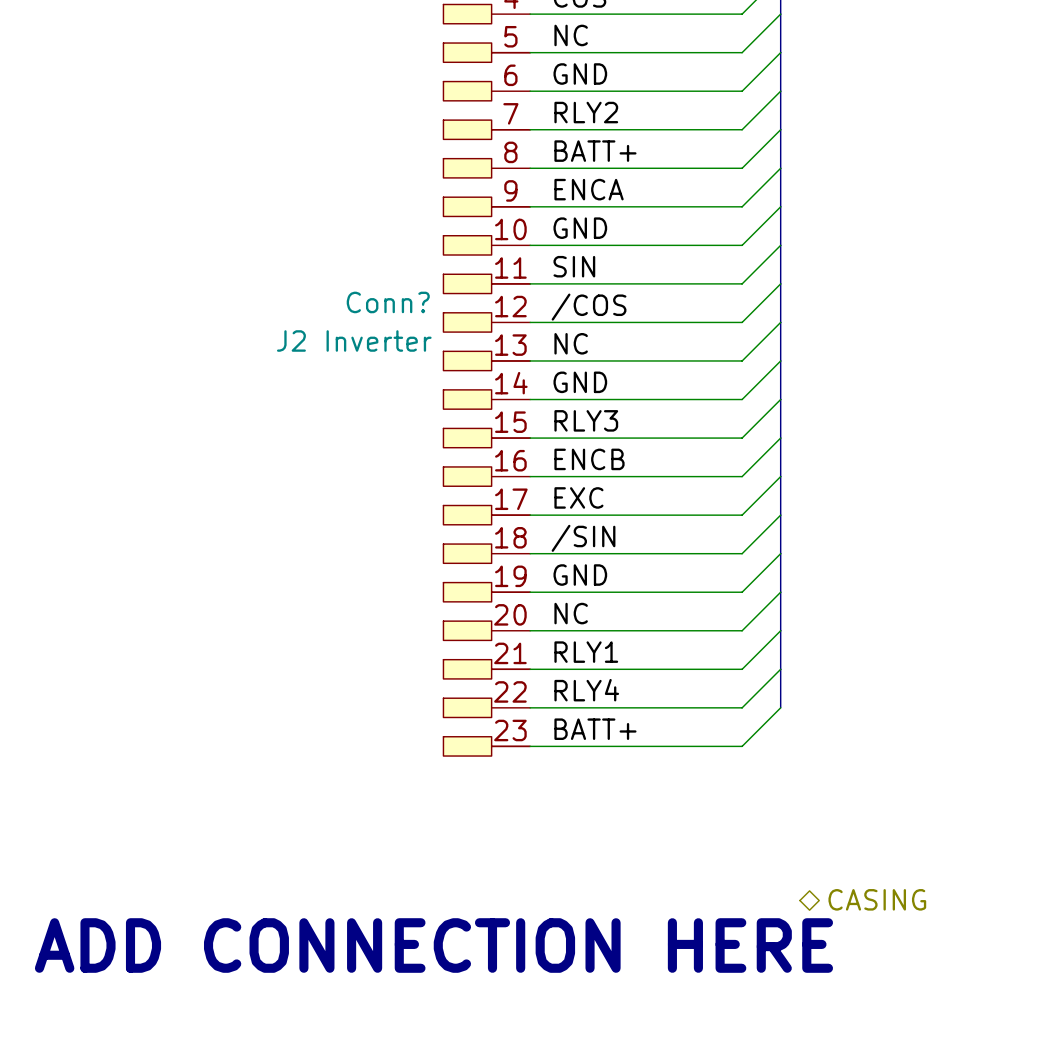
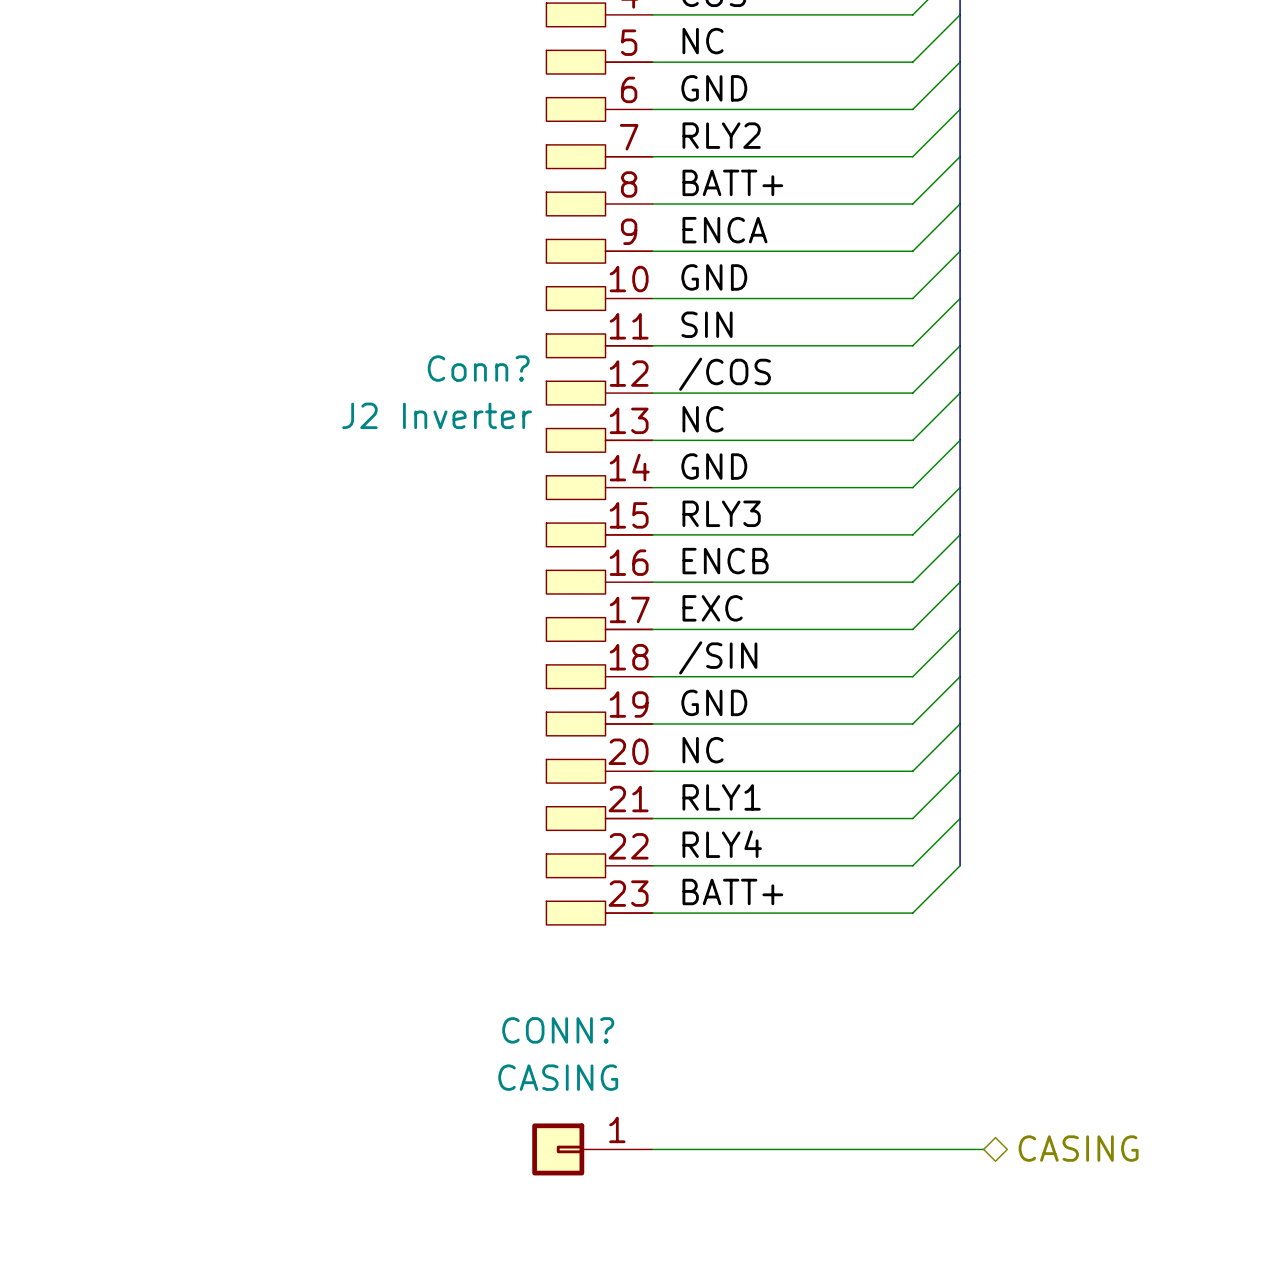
hierarchical label position: CASING (877, 899) -> CASING (1078, 1148)
CONN?: none -> CASING (592, 1149)
wire: none -> (652, 1149) (983, 1149)
text: ADD CONNECTION HERE (433, 945) -> none

